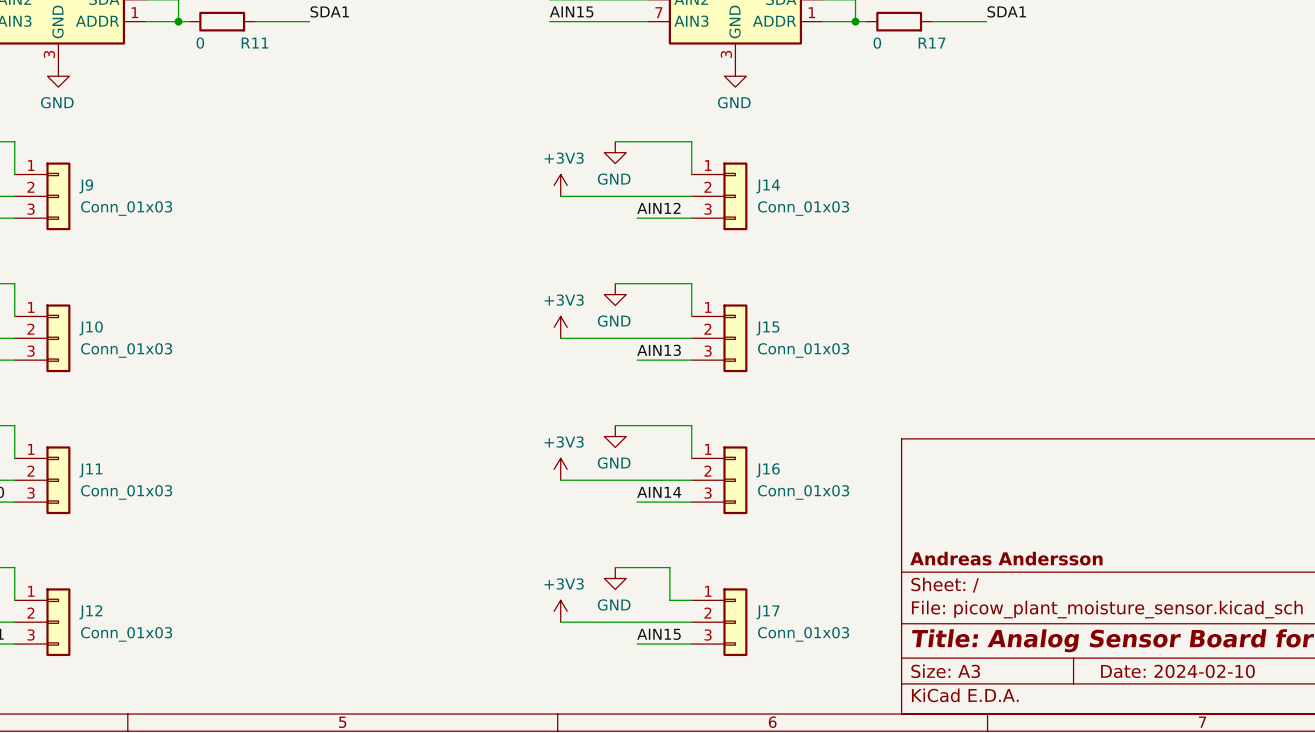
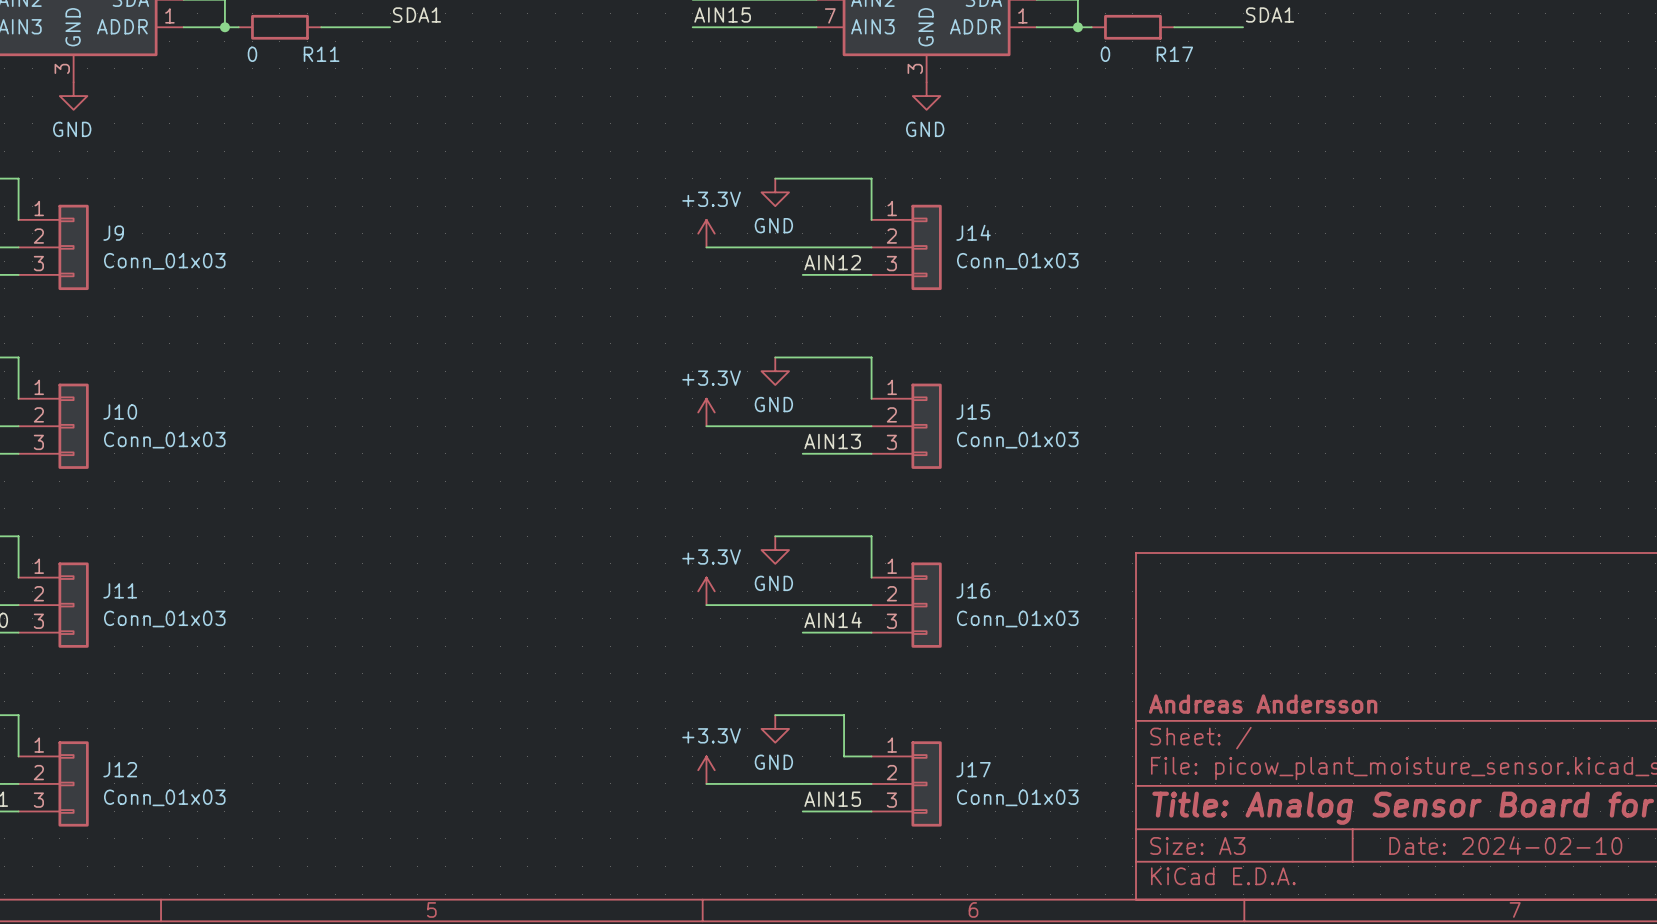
power symbol: +3V3 (560, 185) -> +3.3V (706, 233)
power symbol: +3V3 (560, 327) -> +3.3V (706, 412)
power symbol: +3V3 (560, 469) -> +3.3V (706, 591)
power symbol: +3V3 (560, 611) -> +3.3V (706, 770)

